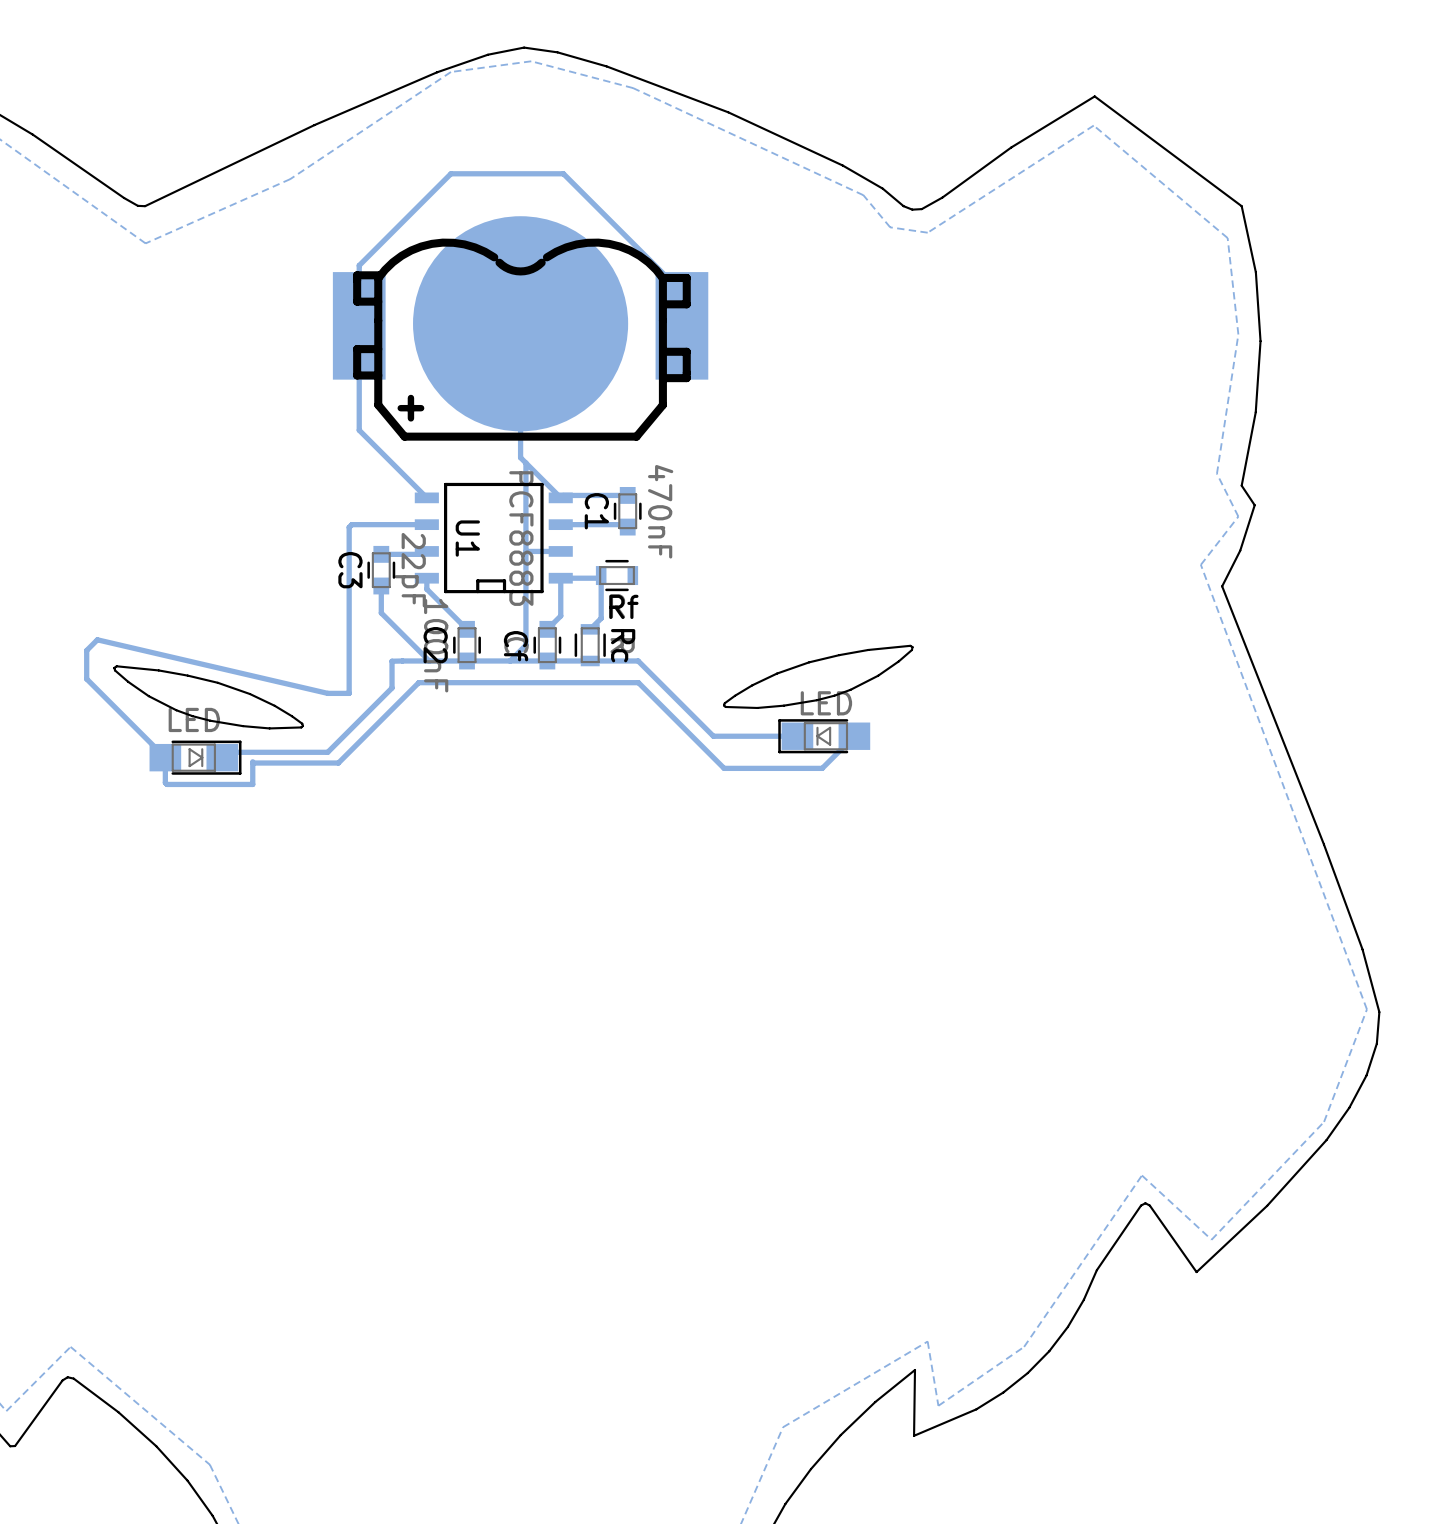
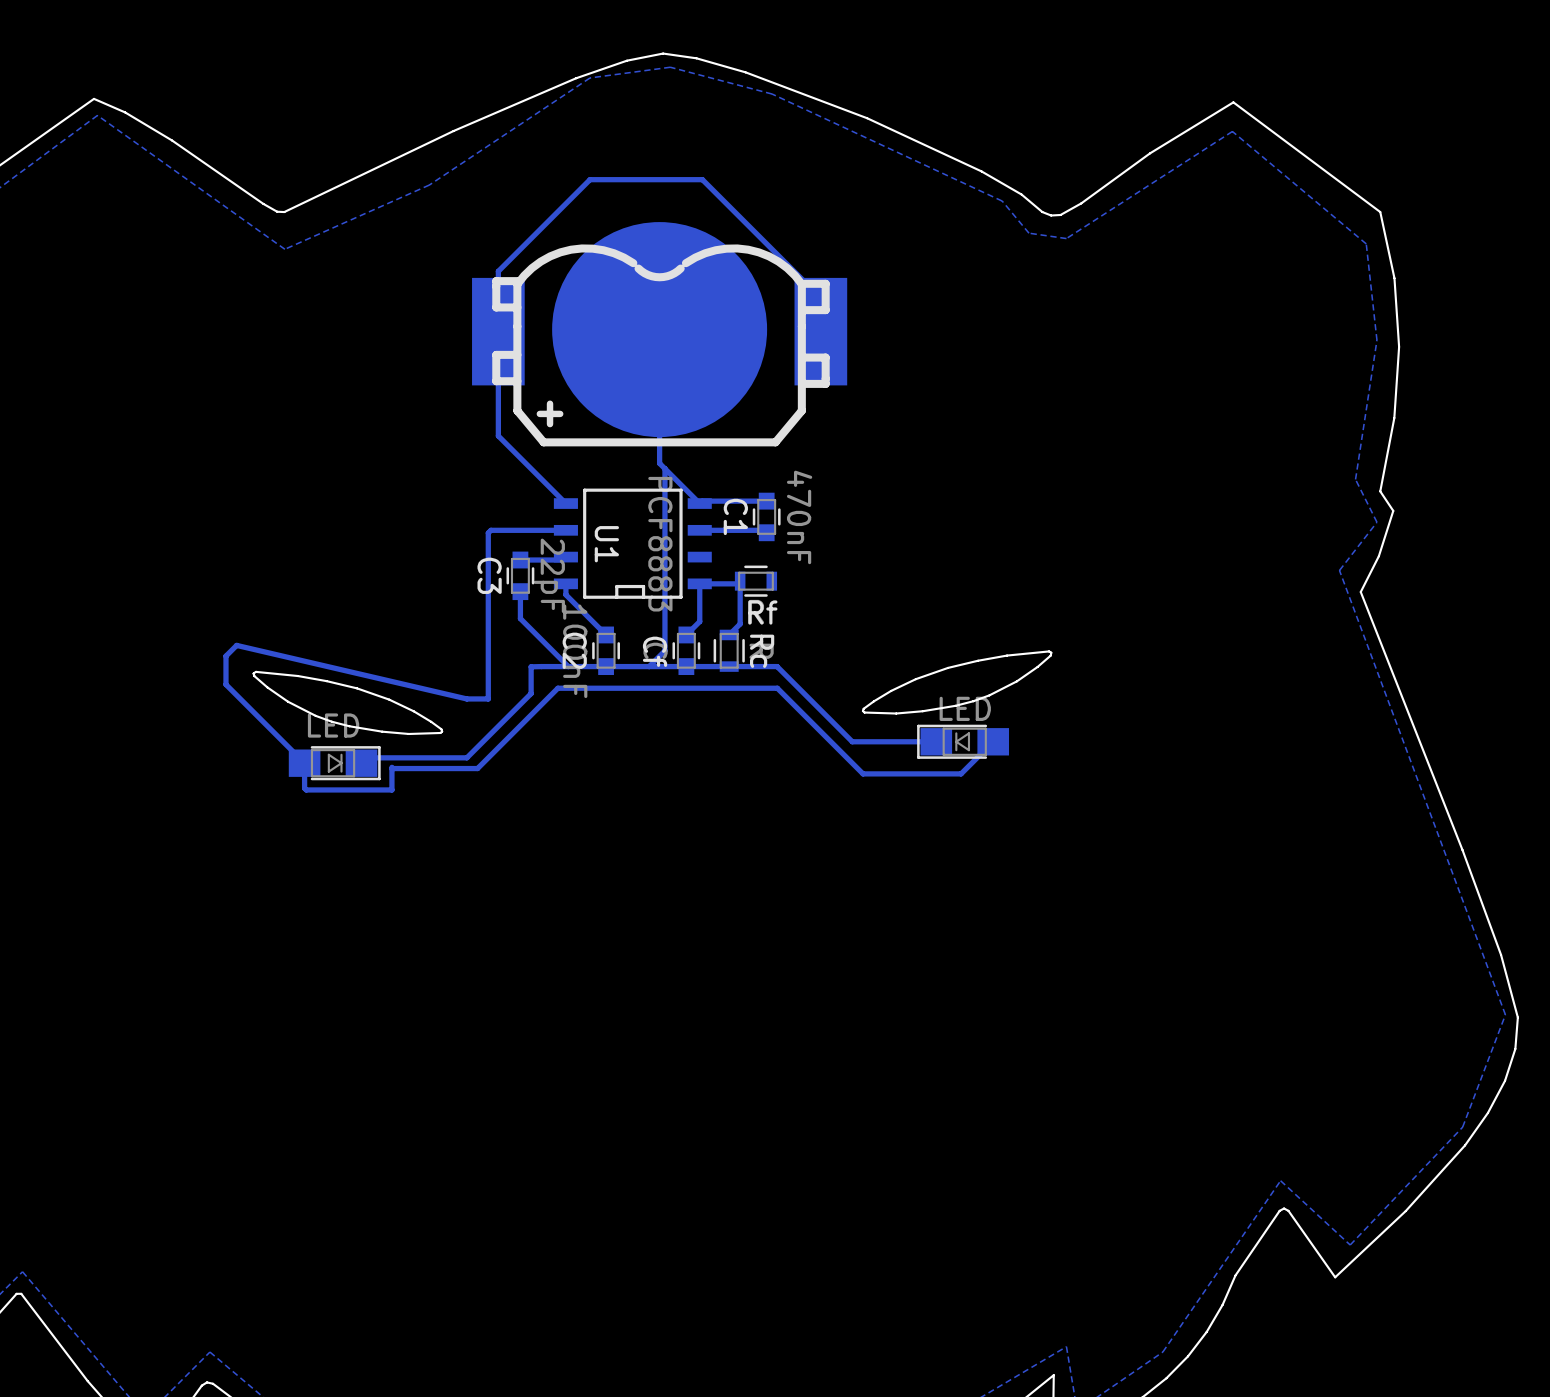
track: (560, 551) (525, 551) -> none

